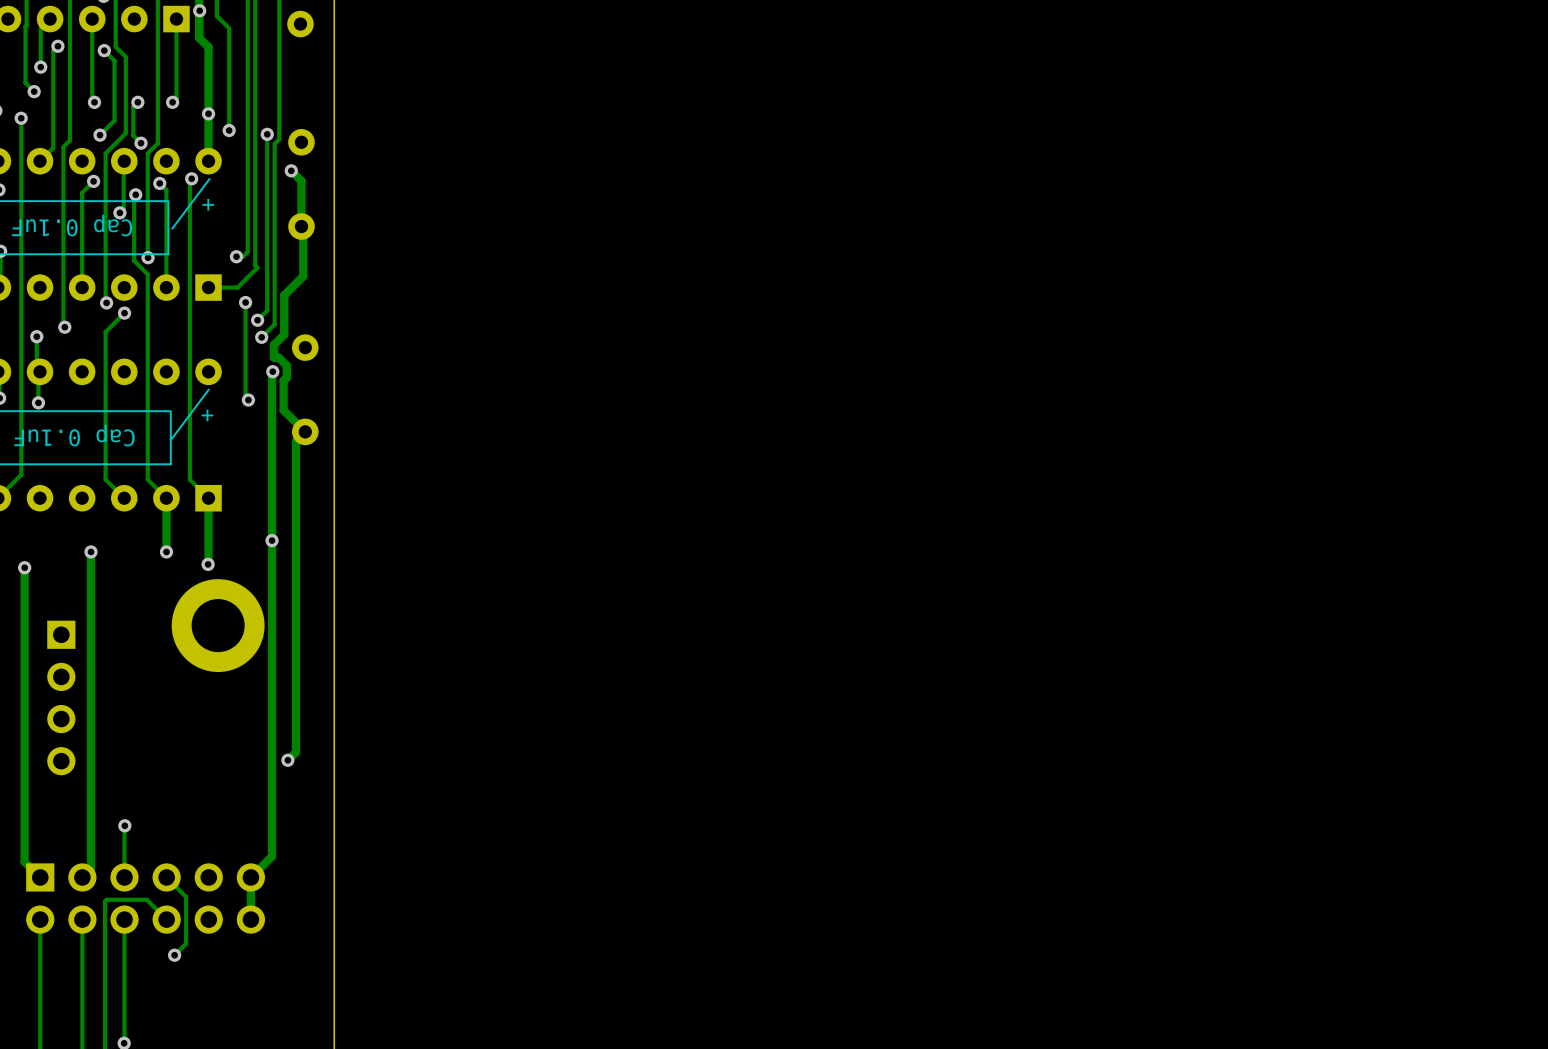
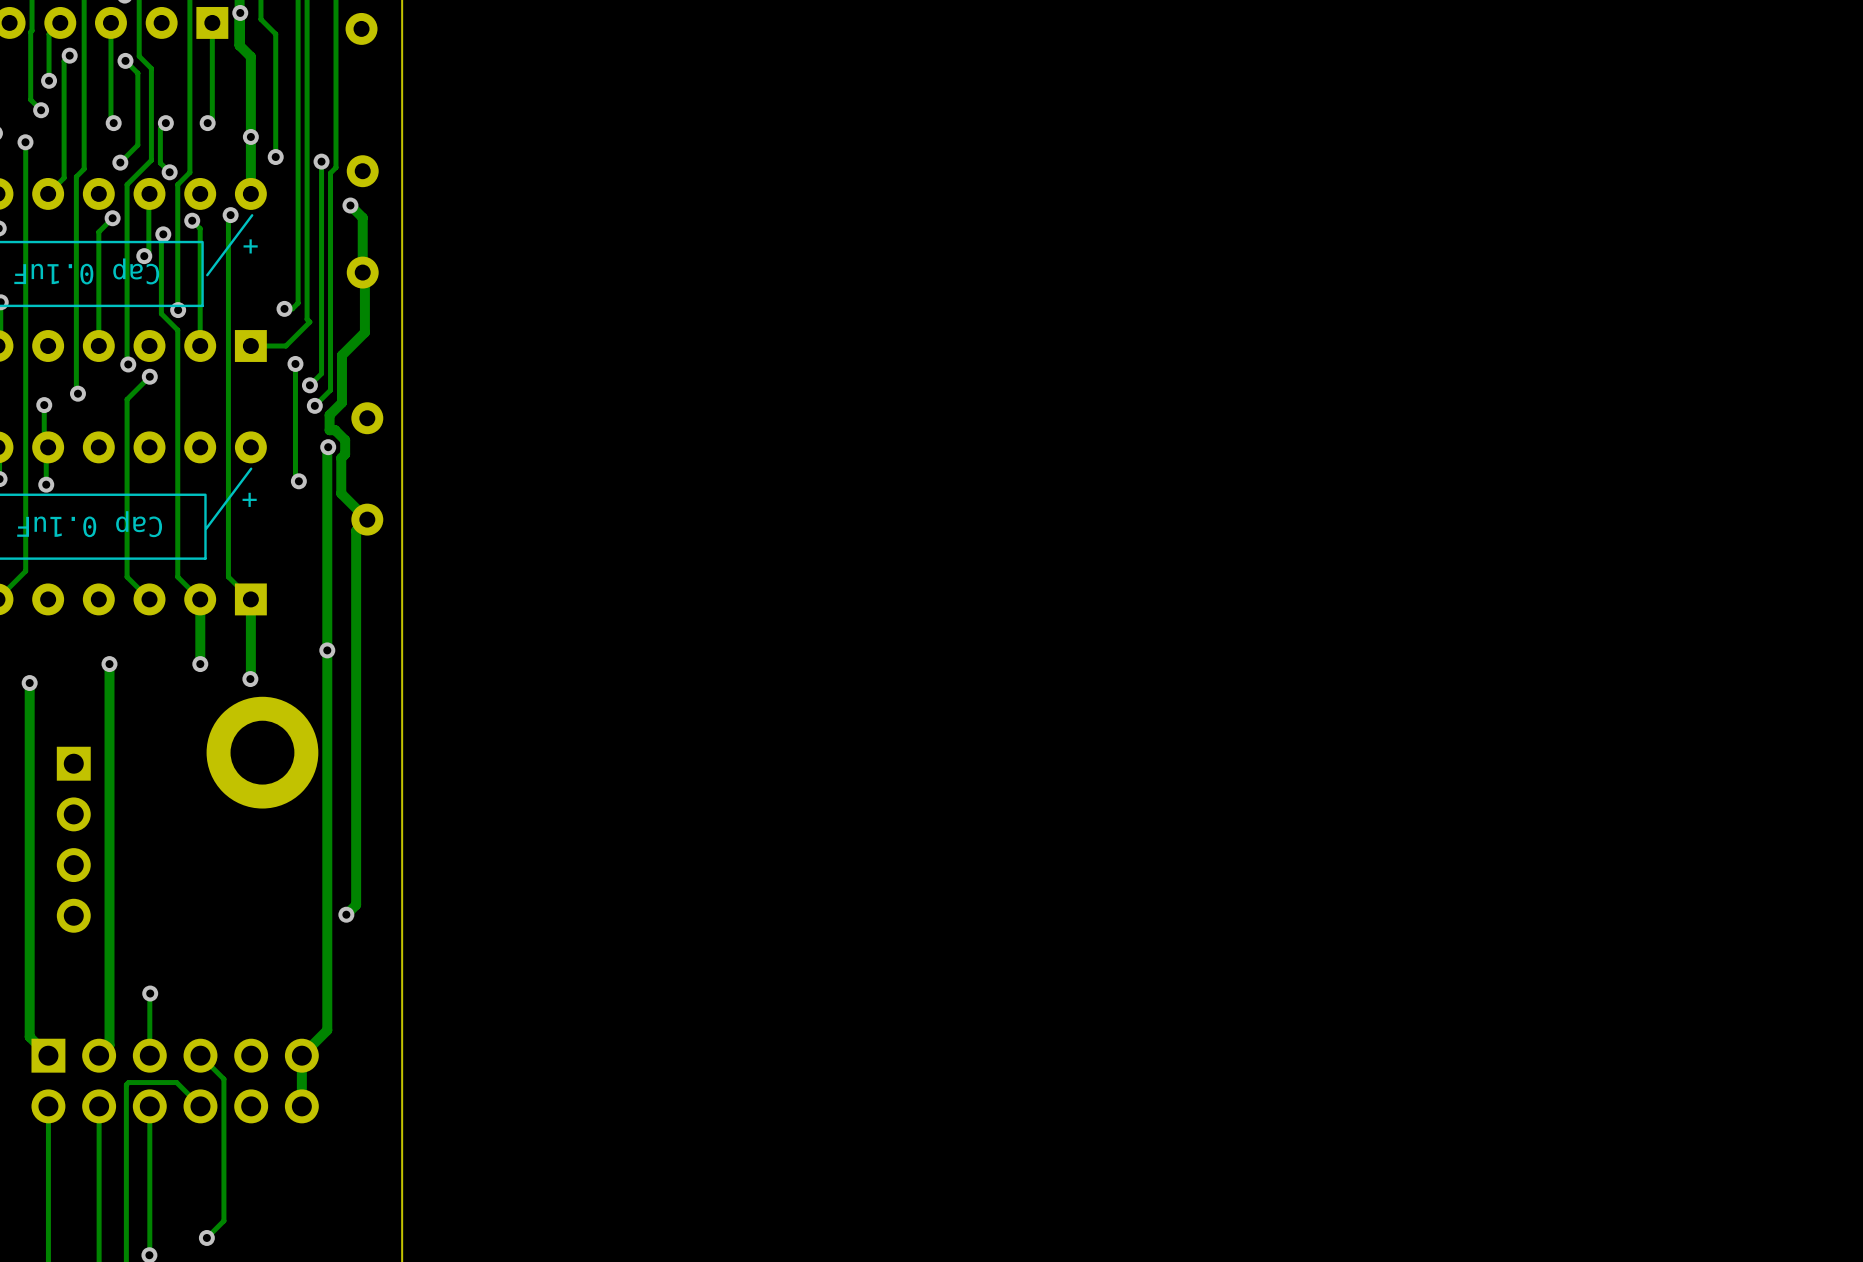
track: (186, 943) (174, 955) -> (223, 1135) (223, 1220) (206, 1237)
via position: (174, 955) -> (206, 1237)

